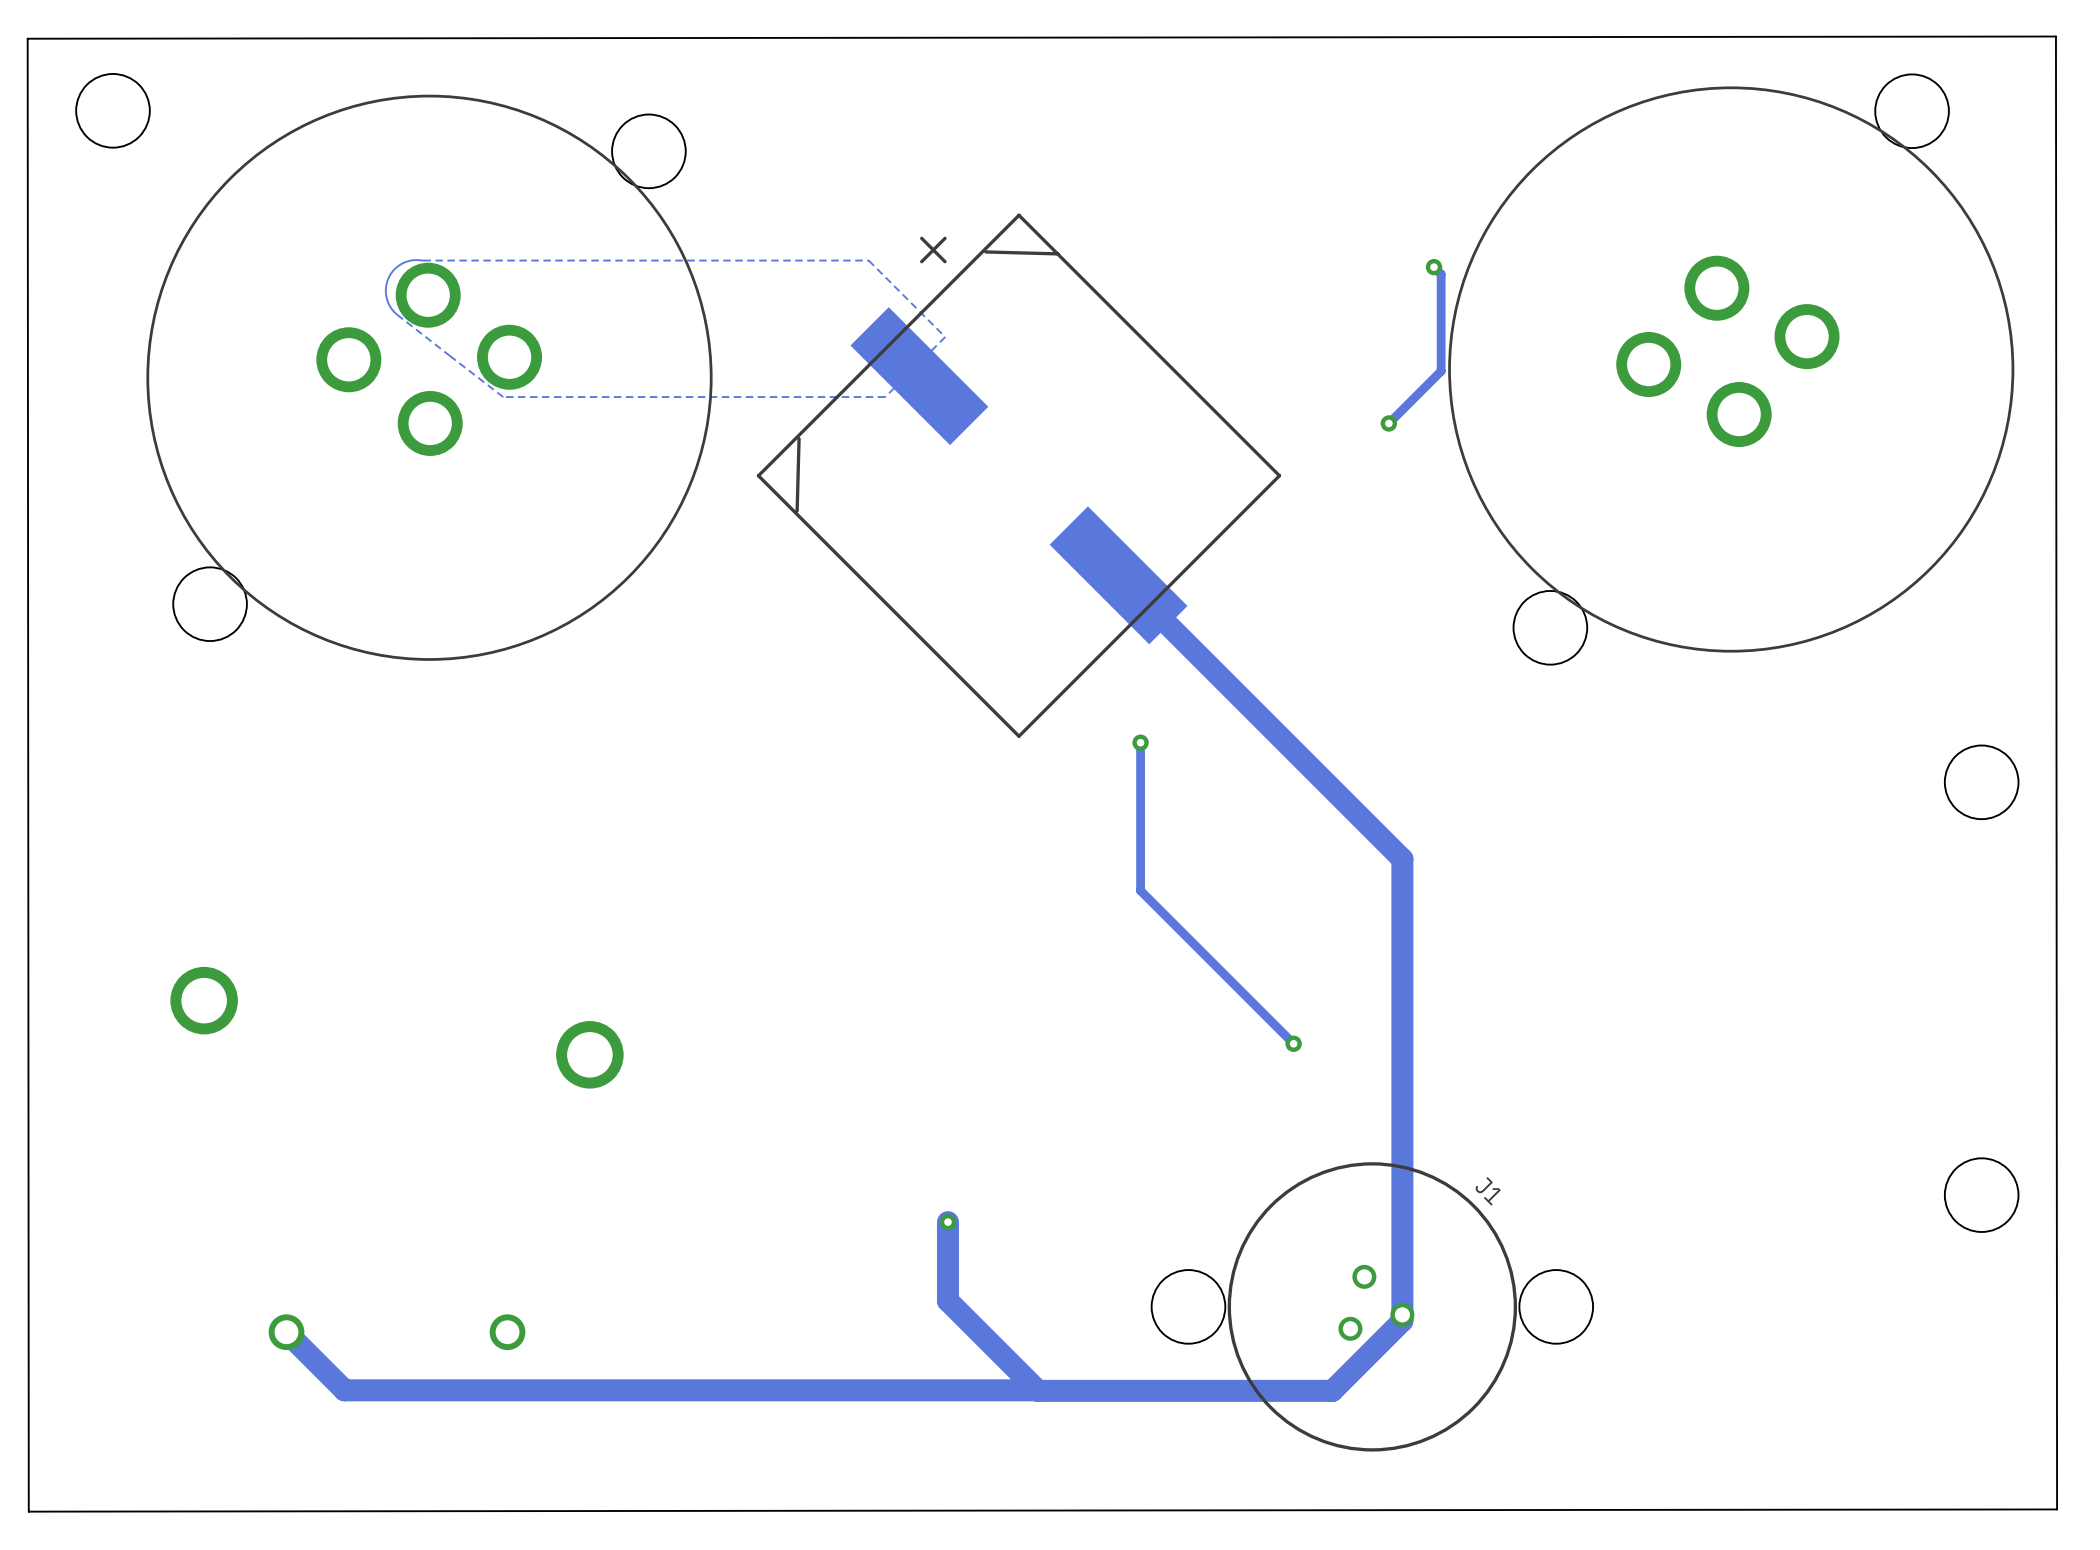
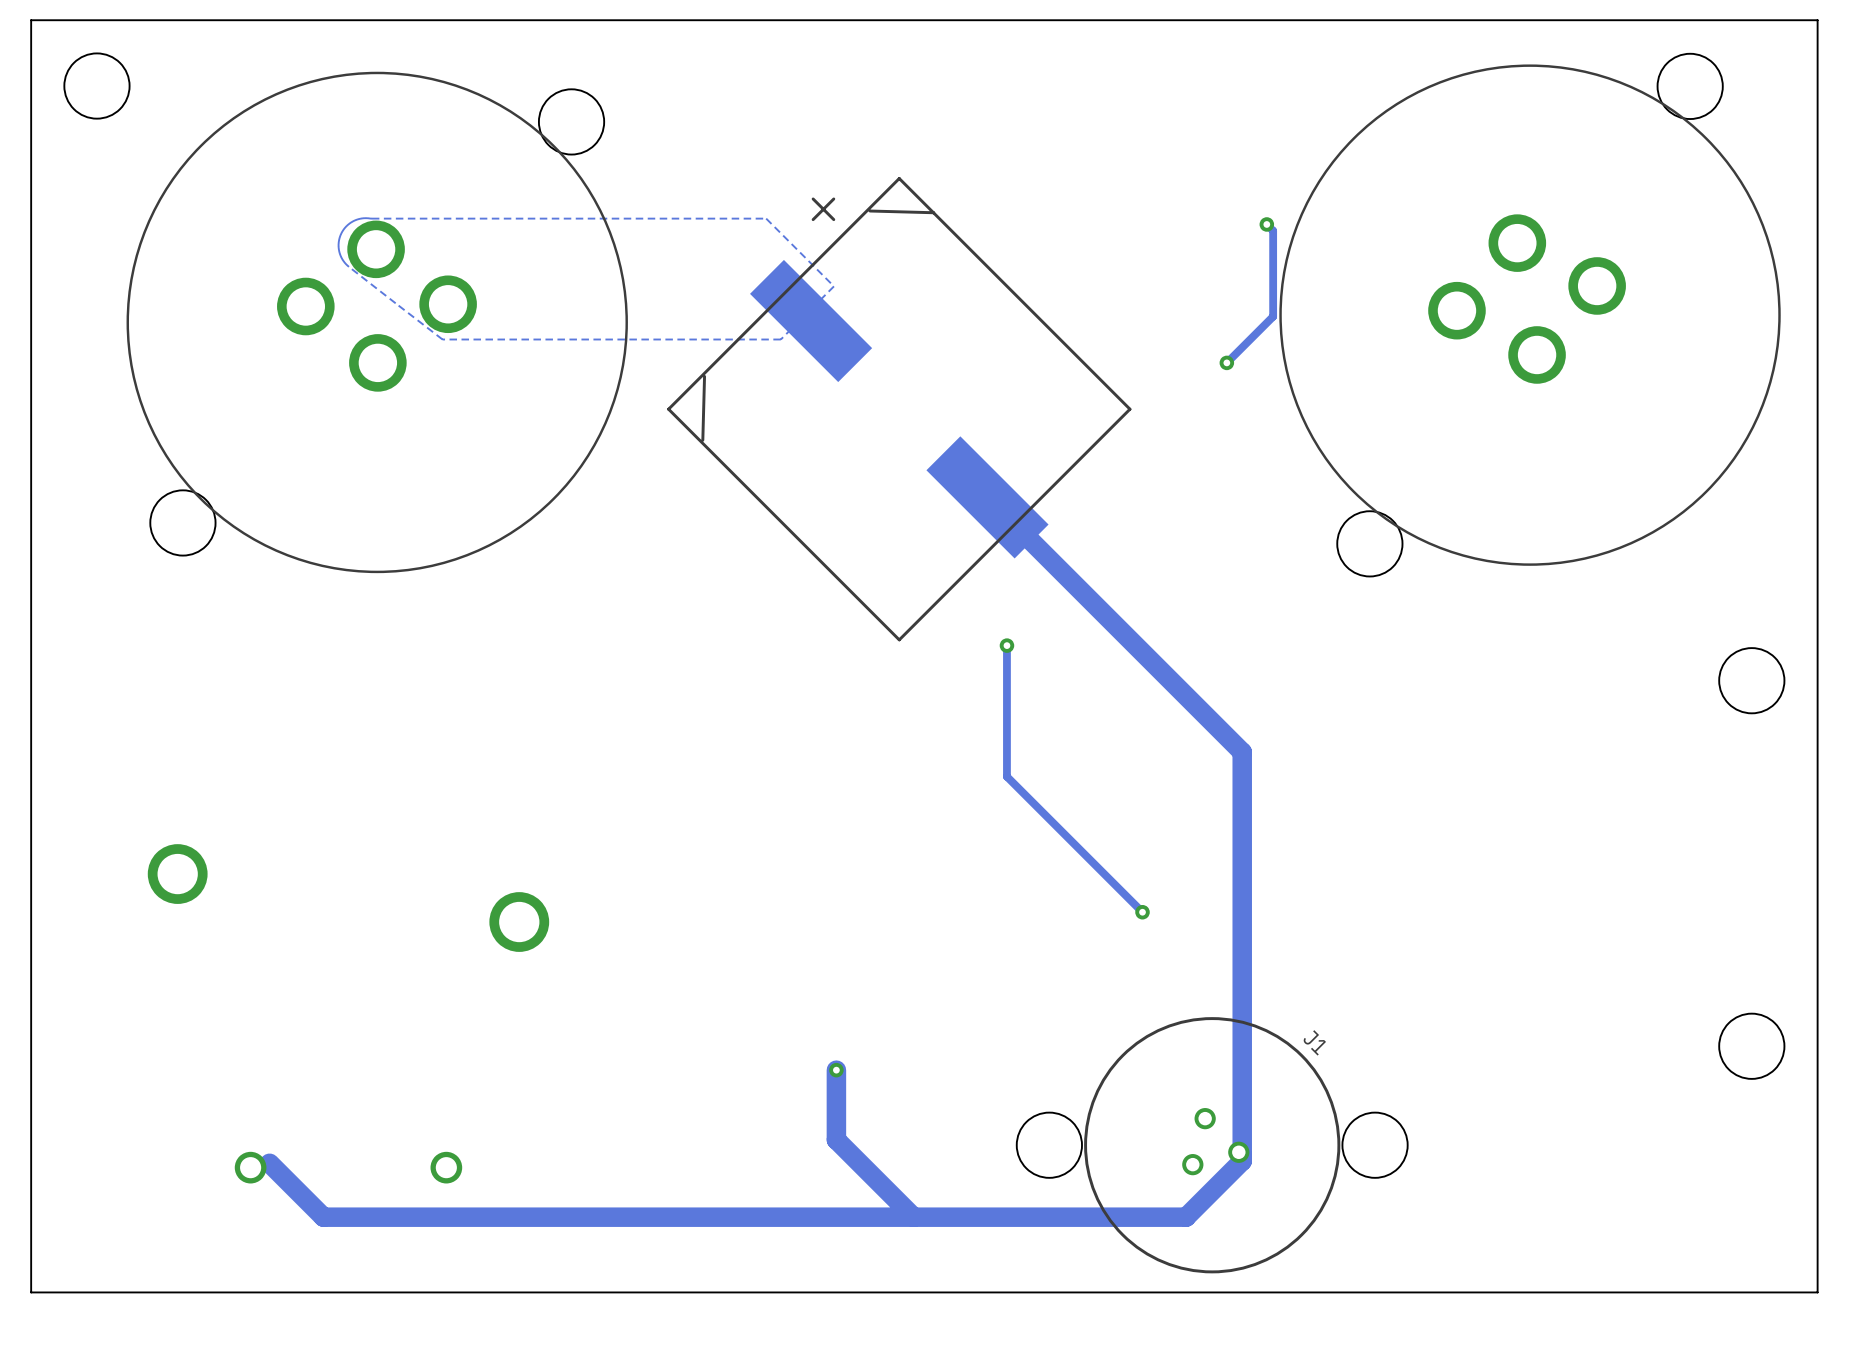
board edge: (2055, 36) (27, 38) (28, 1511) (2057, 1509) (2055, 36) -> (1817, 20) (1817, 1292) (31, 1292) (31, 20) (1817, 20)
track: (1402, 859) (1402, 1320) (1332, 1390) (1038, 1390) (1035, 1388) -> (1238, 748) (1242, 752) (1242, 1161) (1186, 1217) (323, 1217) (269, 1163)
track: (286, 1332) (344, 1390) (1037, 1390) -> none

